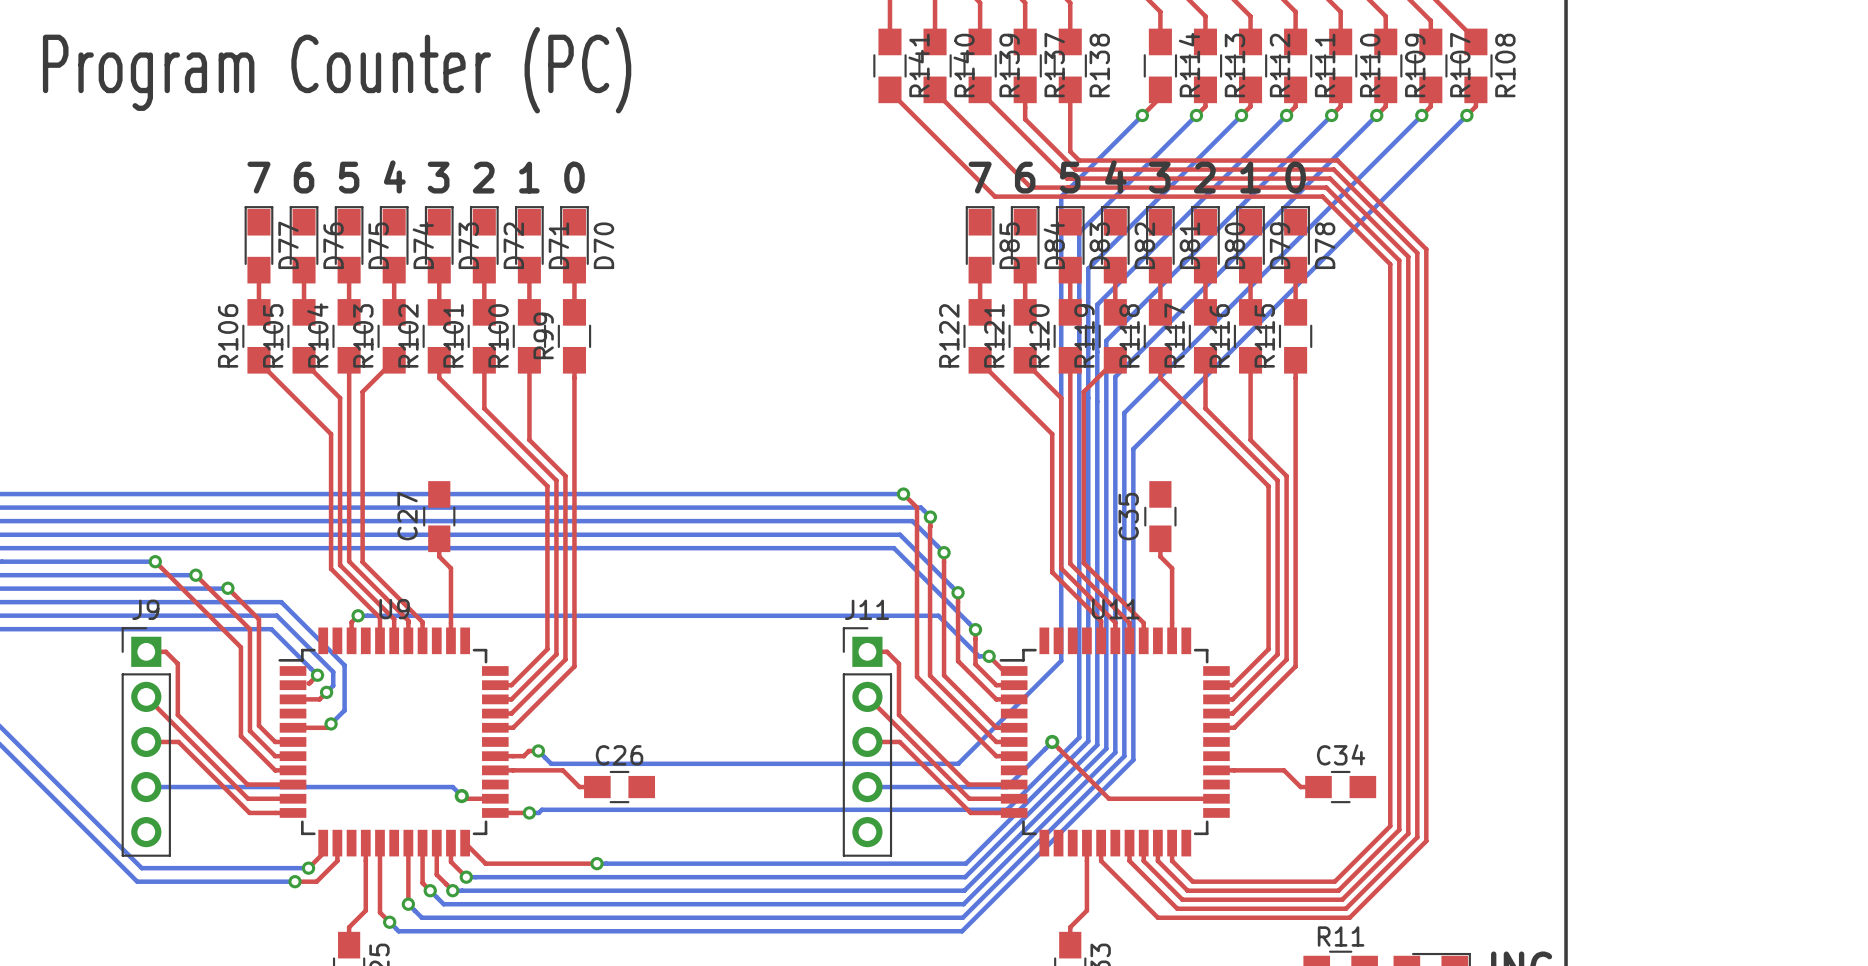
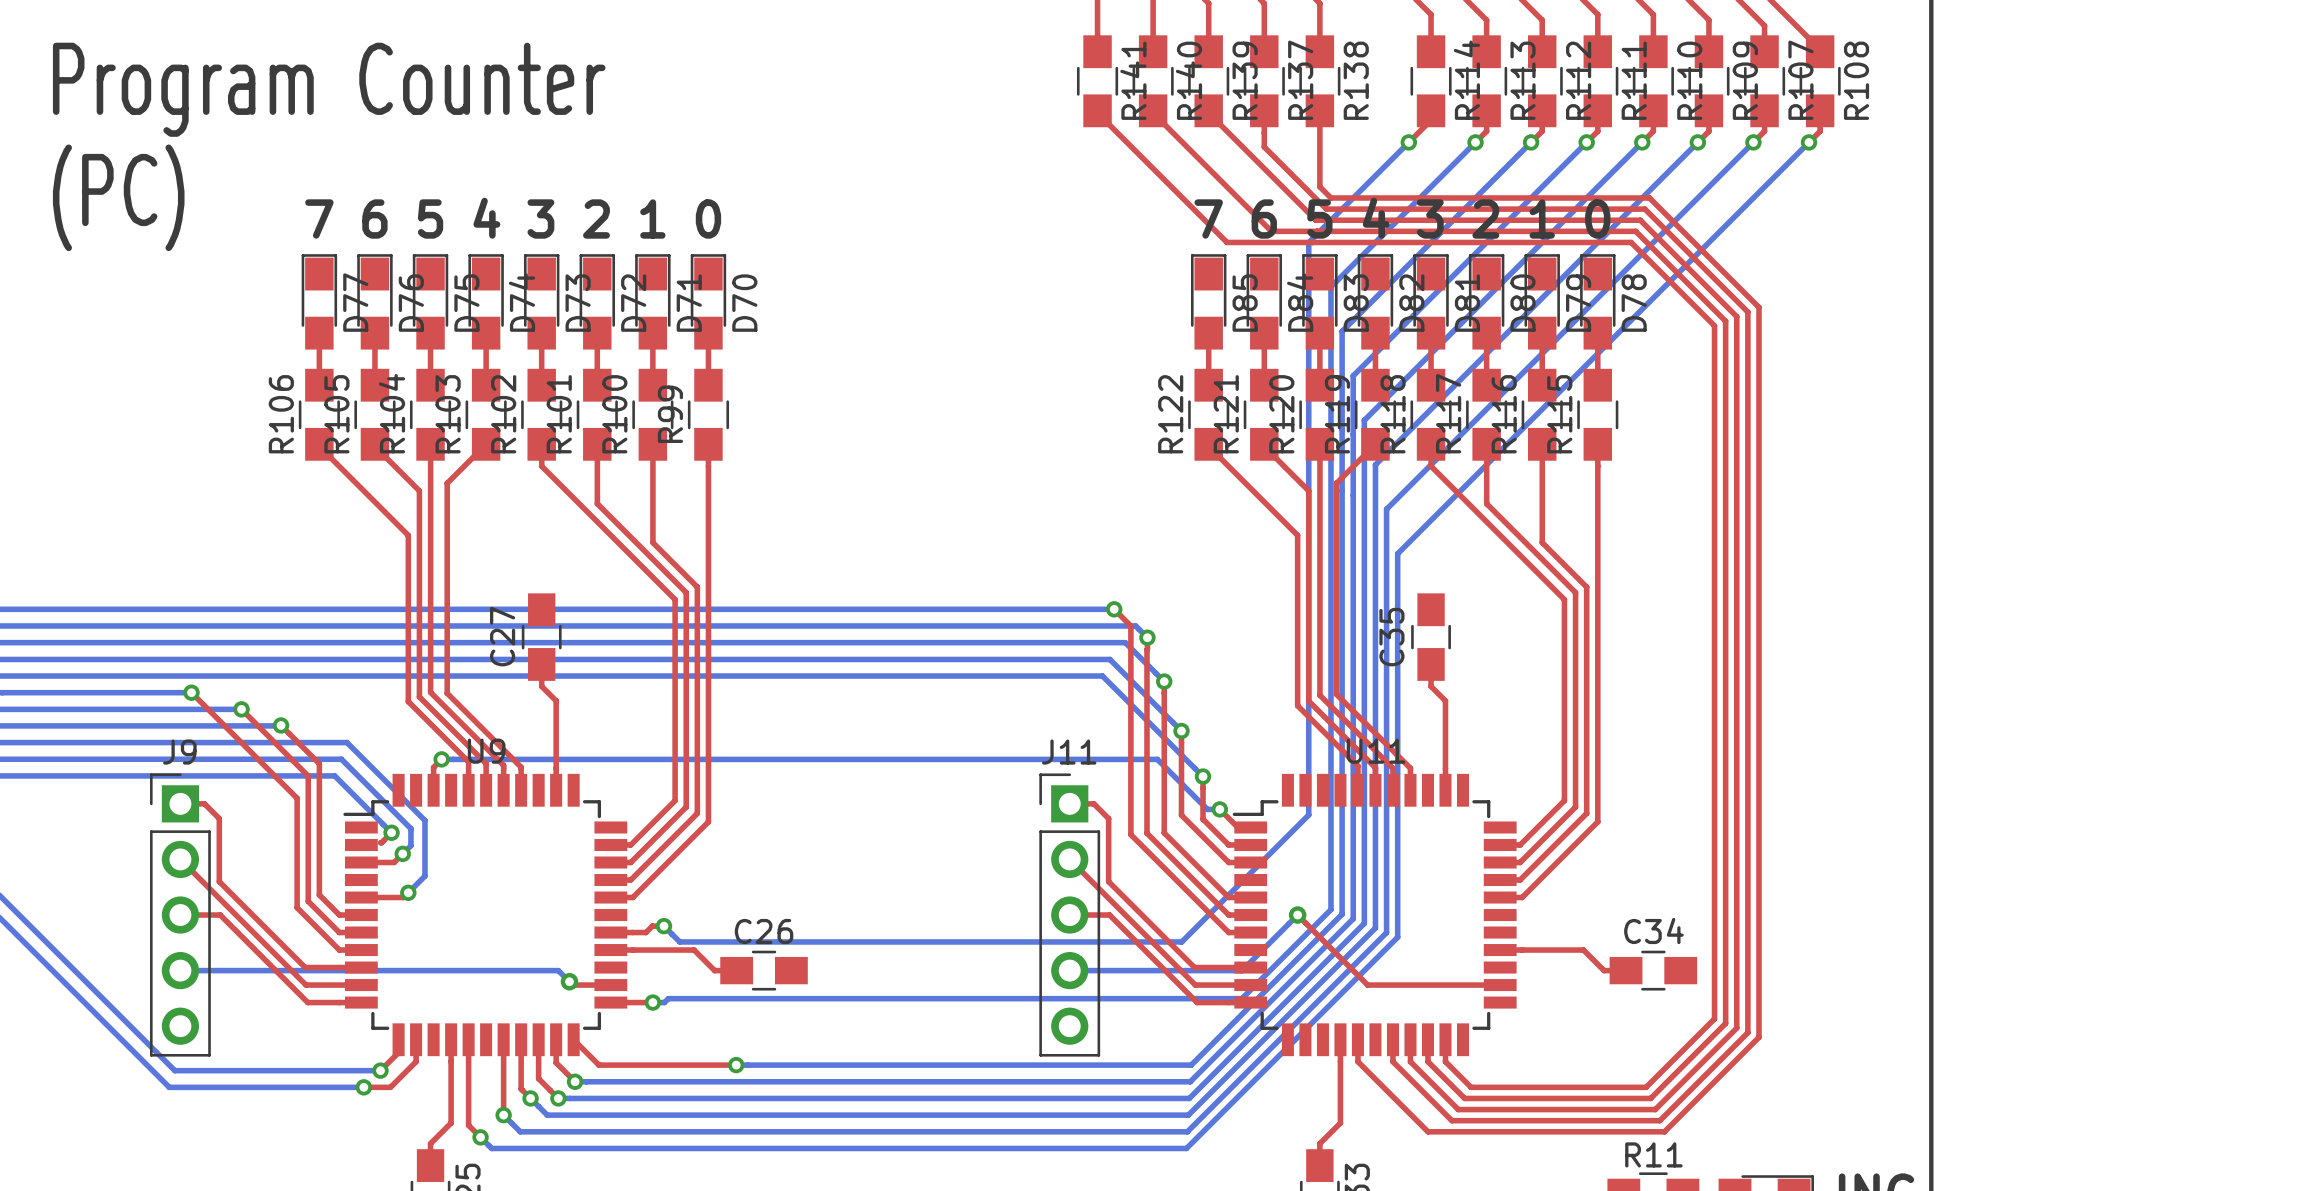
text: Program Counter (PC) (337, 70) -> Program Counter (329, 89)
text: none -> (PC) (118, 197)

